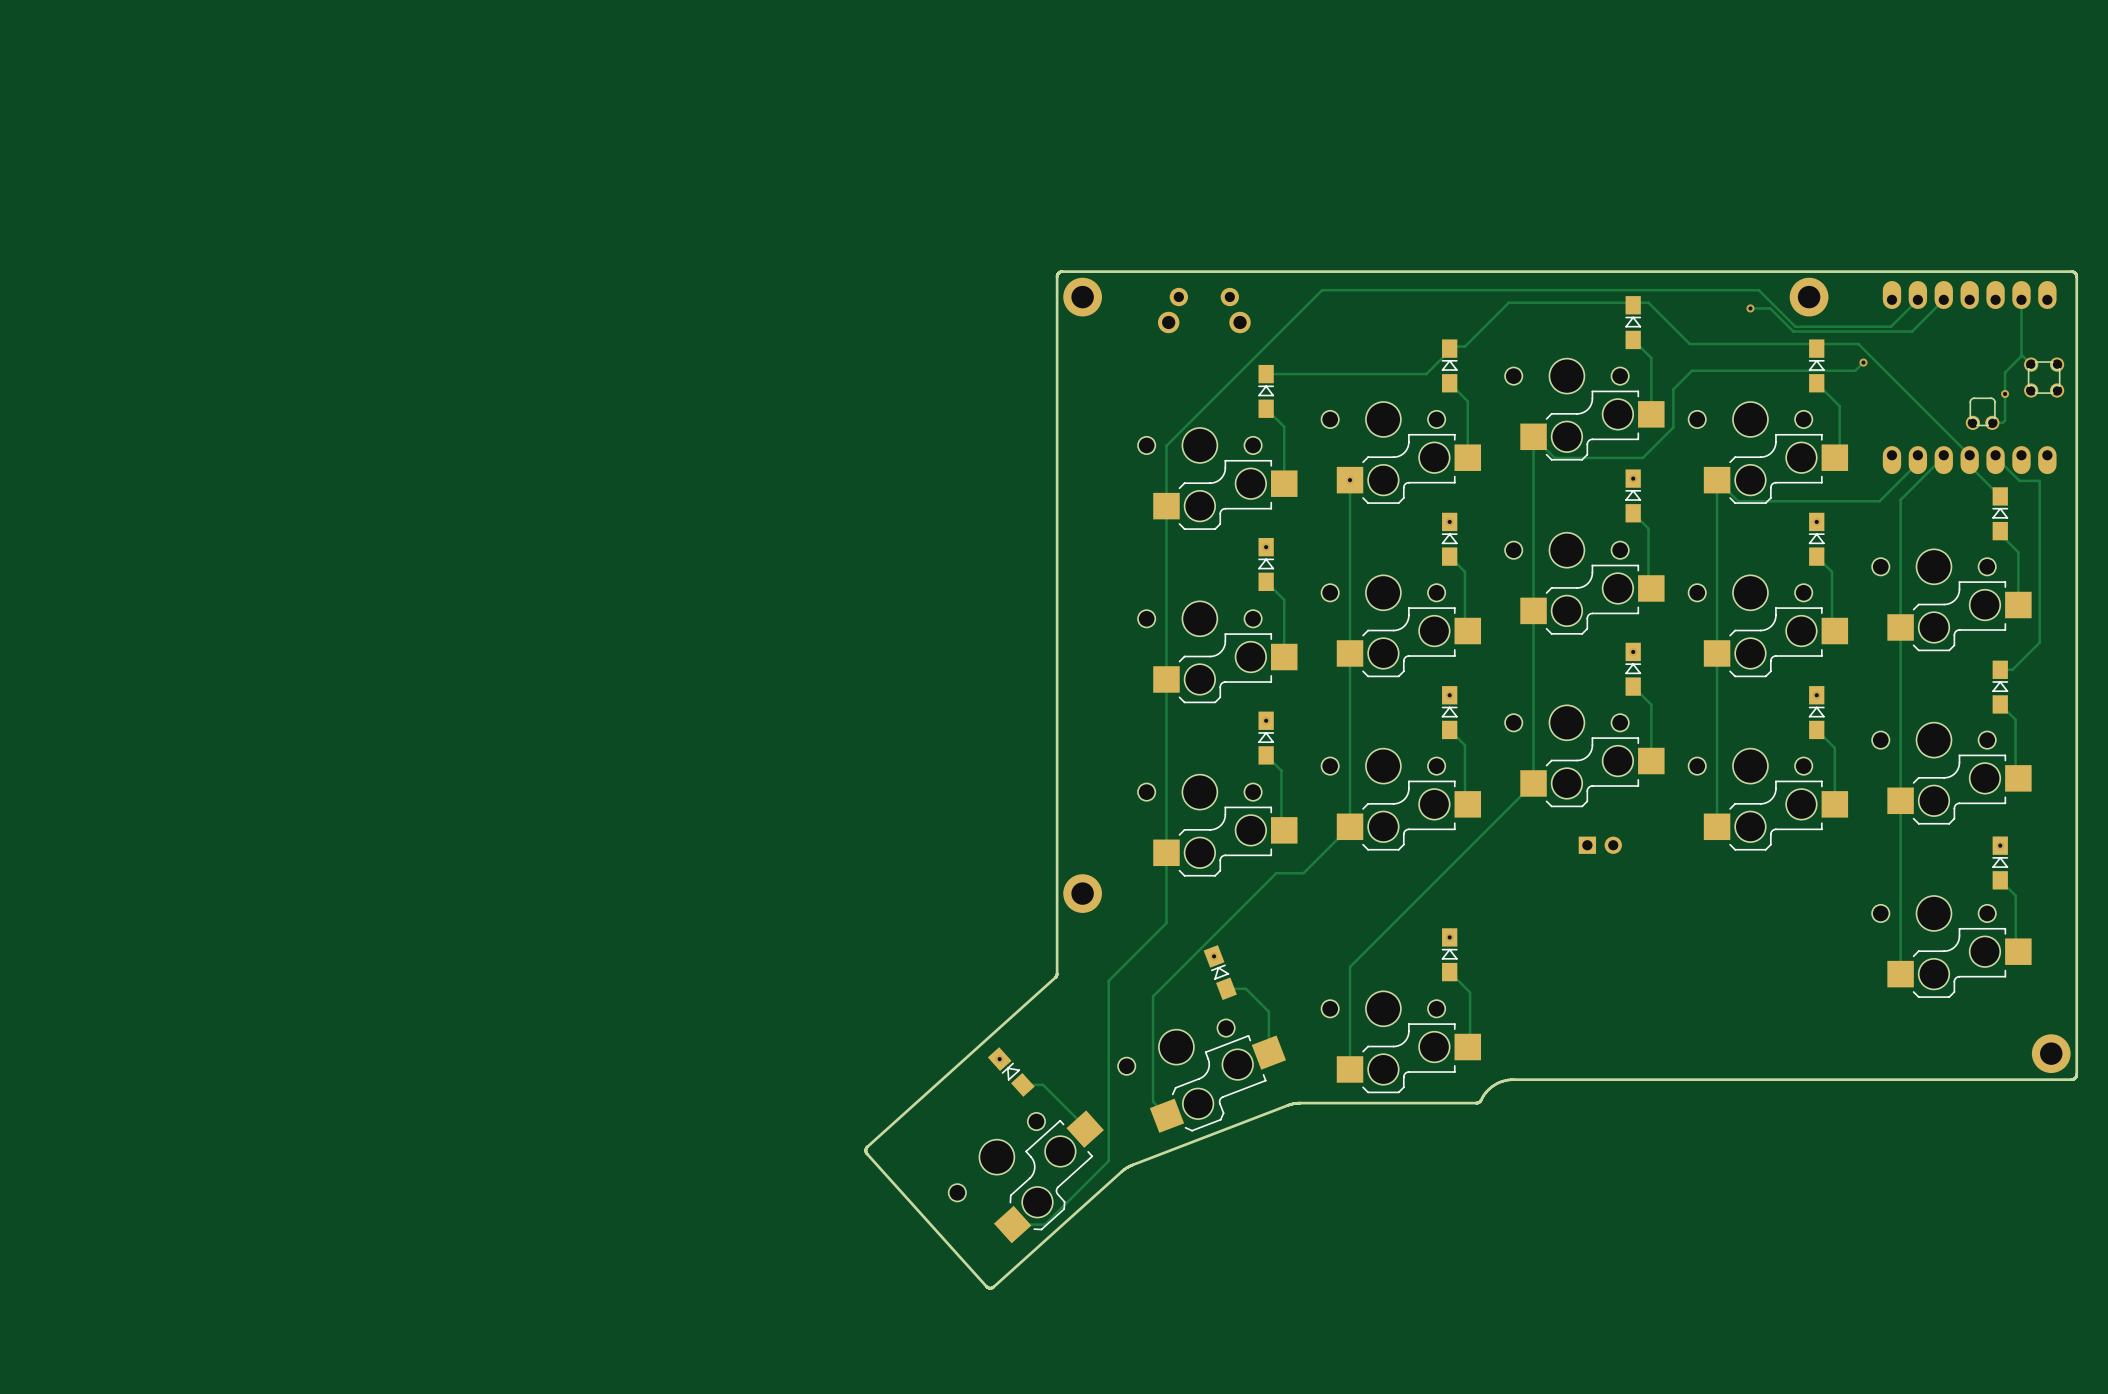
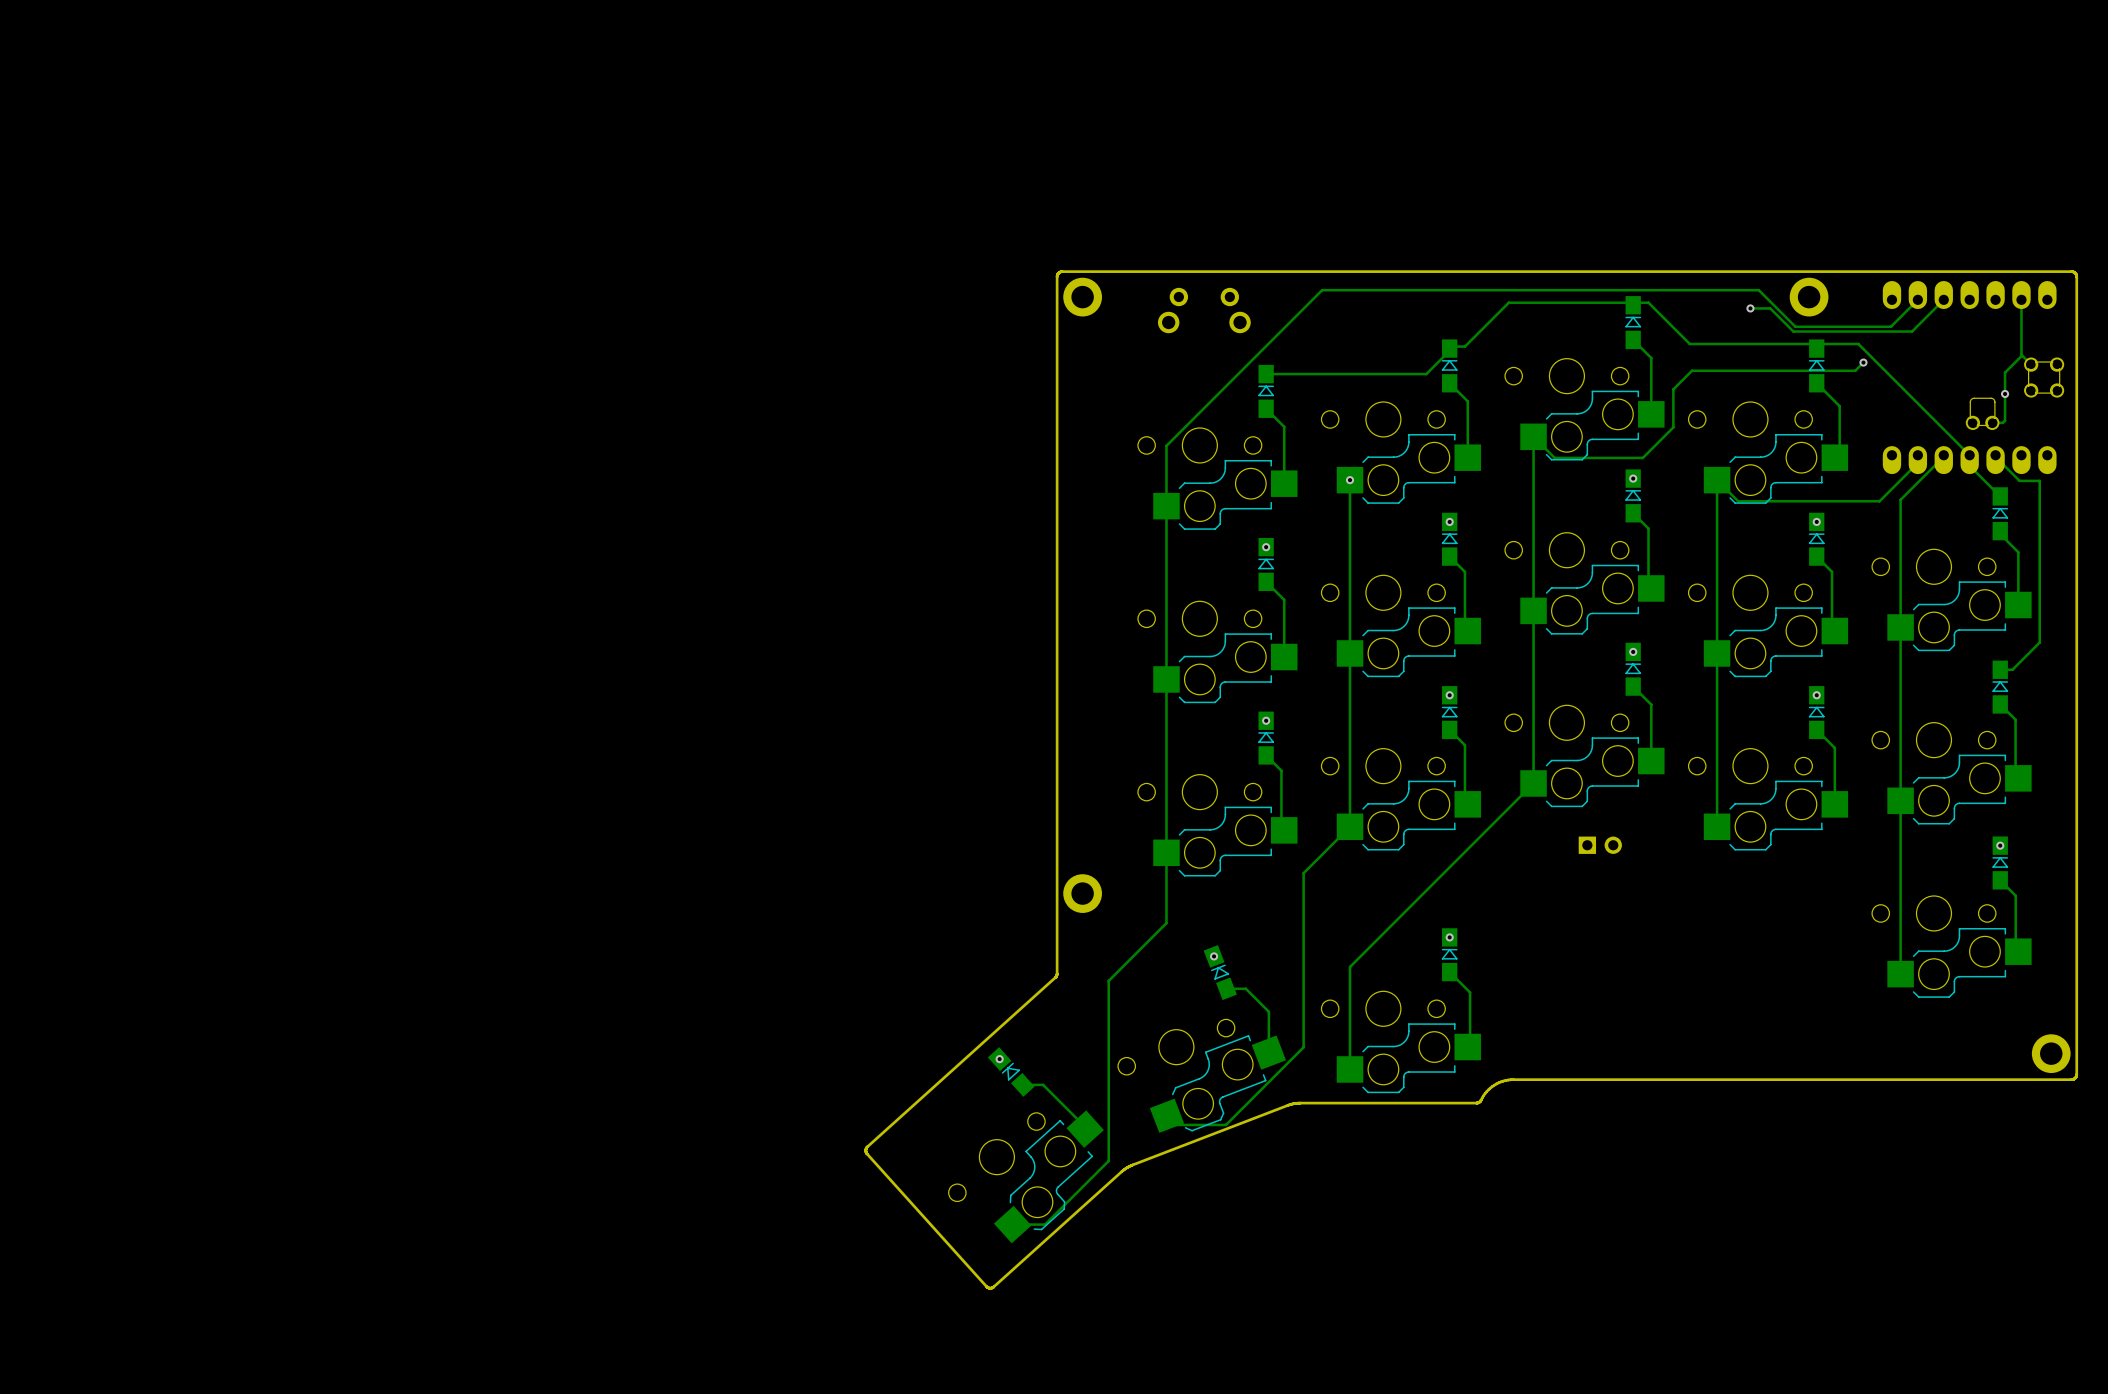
track: (1303, 873) (1276, 873) (1153, 996) (1153, 1101) (1166, 1115) -> (1303, 873) (1303, 1047) (1225, 1124) (1176, 1124)

